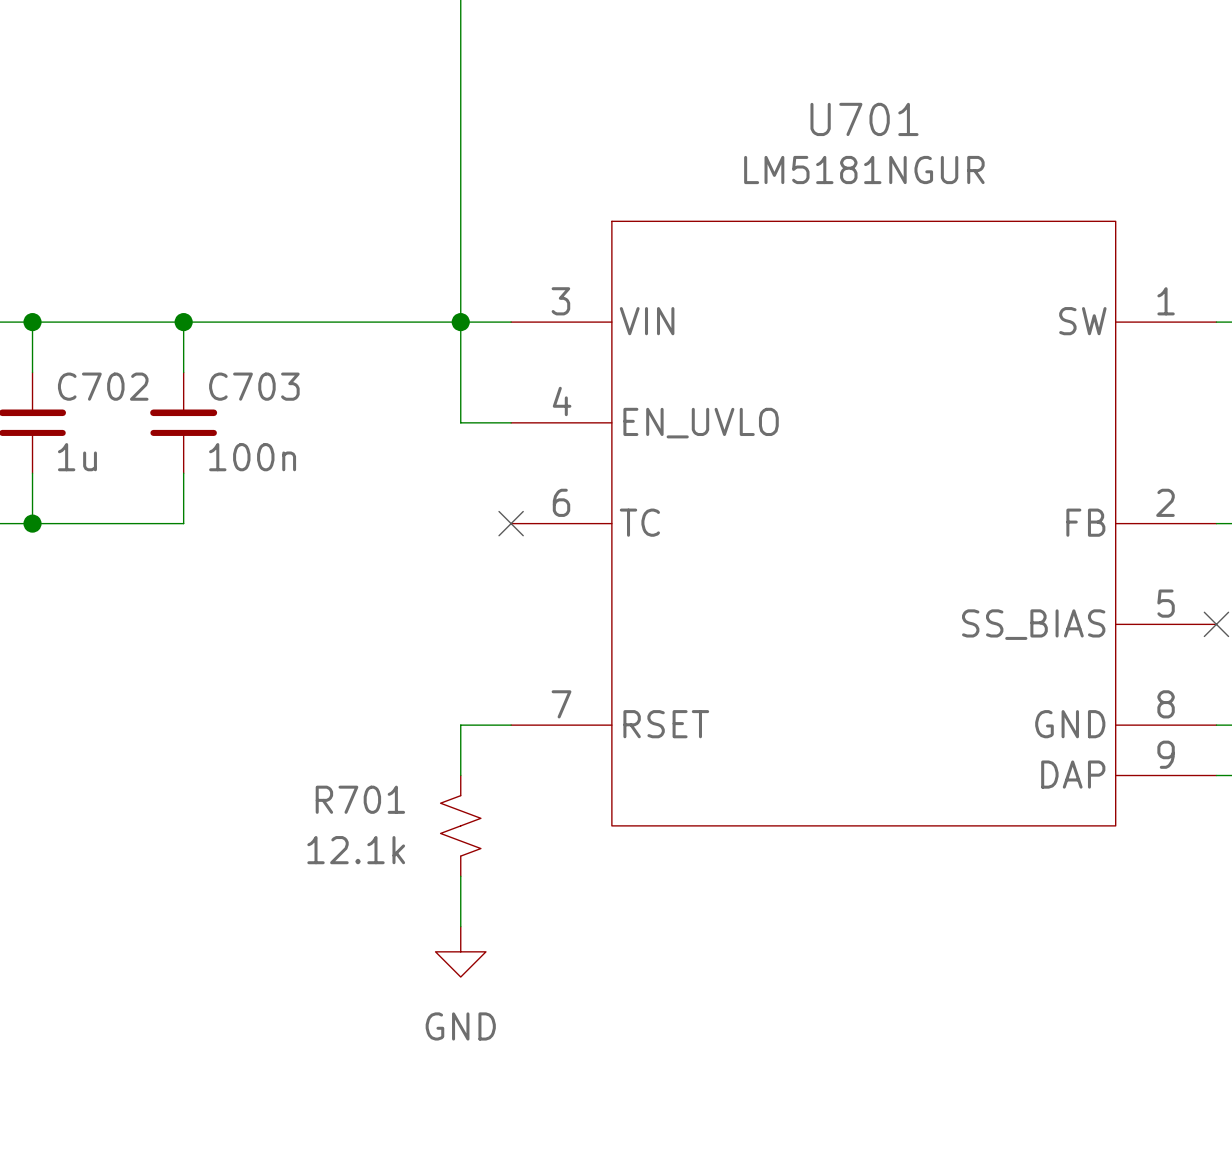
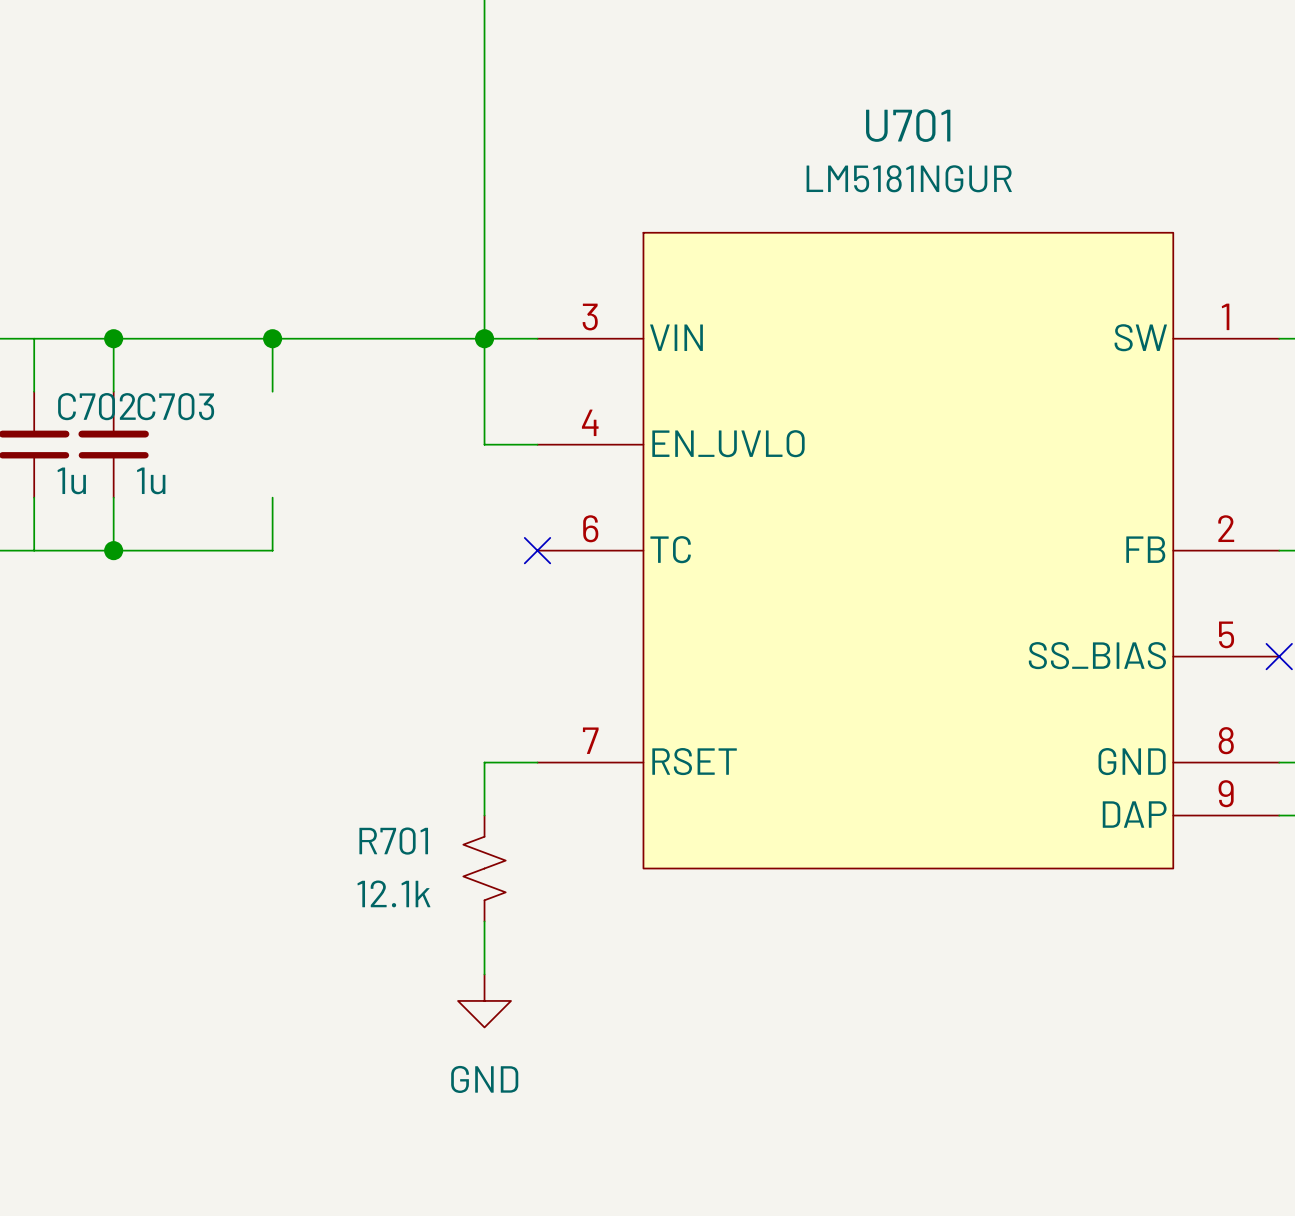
junction: (32, 322) -> none
junction: none -> (113, 338)
wire: (183, 322) (183, 372) -> (113, 338) (113, 391)
junction: (183, 322) -> none
wire: none -> (272, 338) (272, 391)
junction: none -> (272, 338)
C703 position: (183, 422) -> (113, 444)
C703 value: 100n (252, 457) -> 1u (151, 480)
wire: none -> (113, 497) (113, 550)
wire: (183, 473) (183, 523) -> (272, 497) (272, 550) (193, 550)
junction: (32, 523) -> none
junction: none -> (113, 550)

